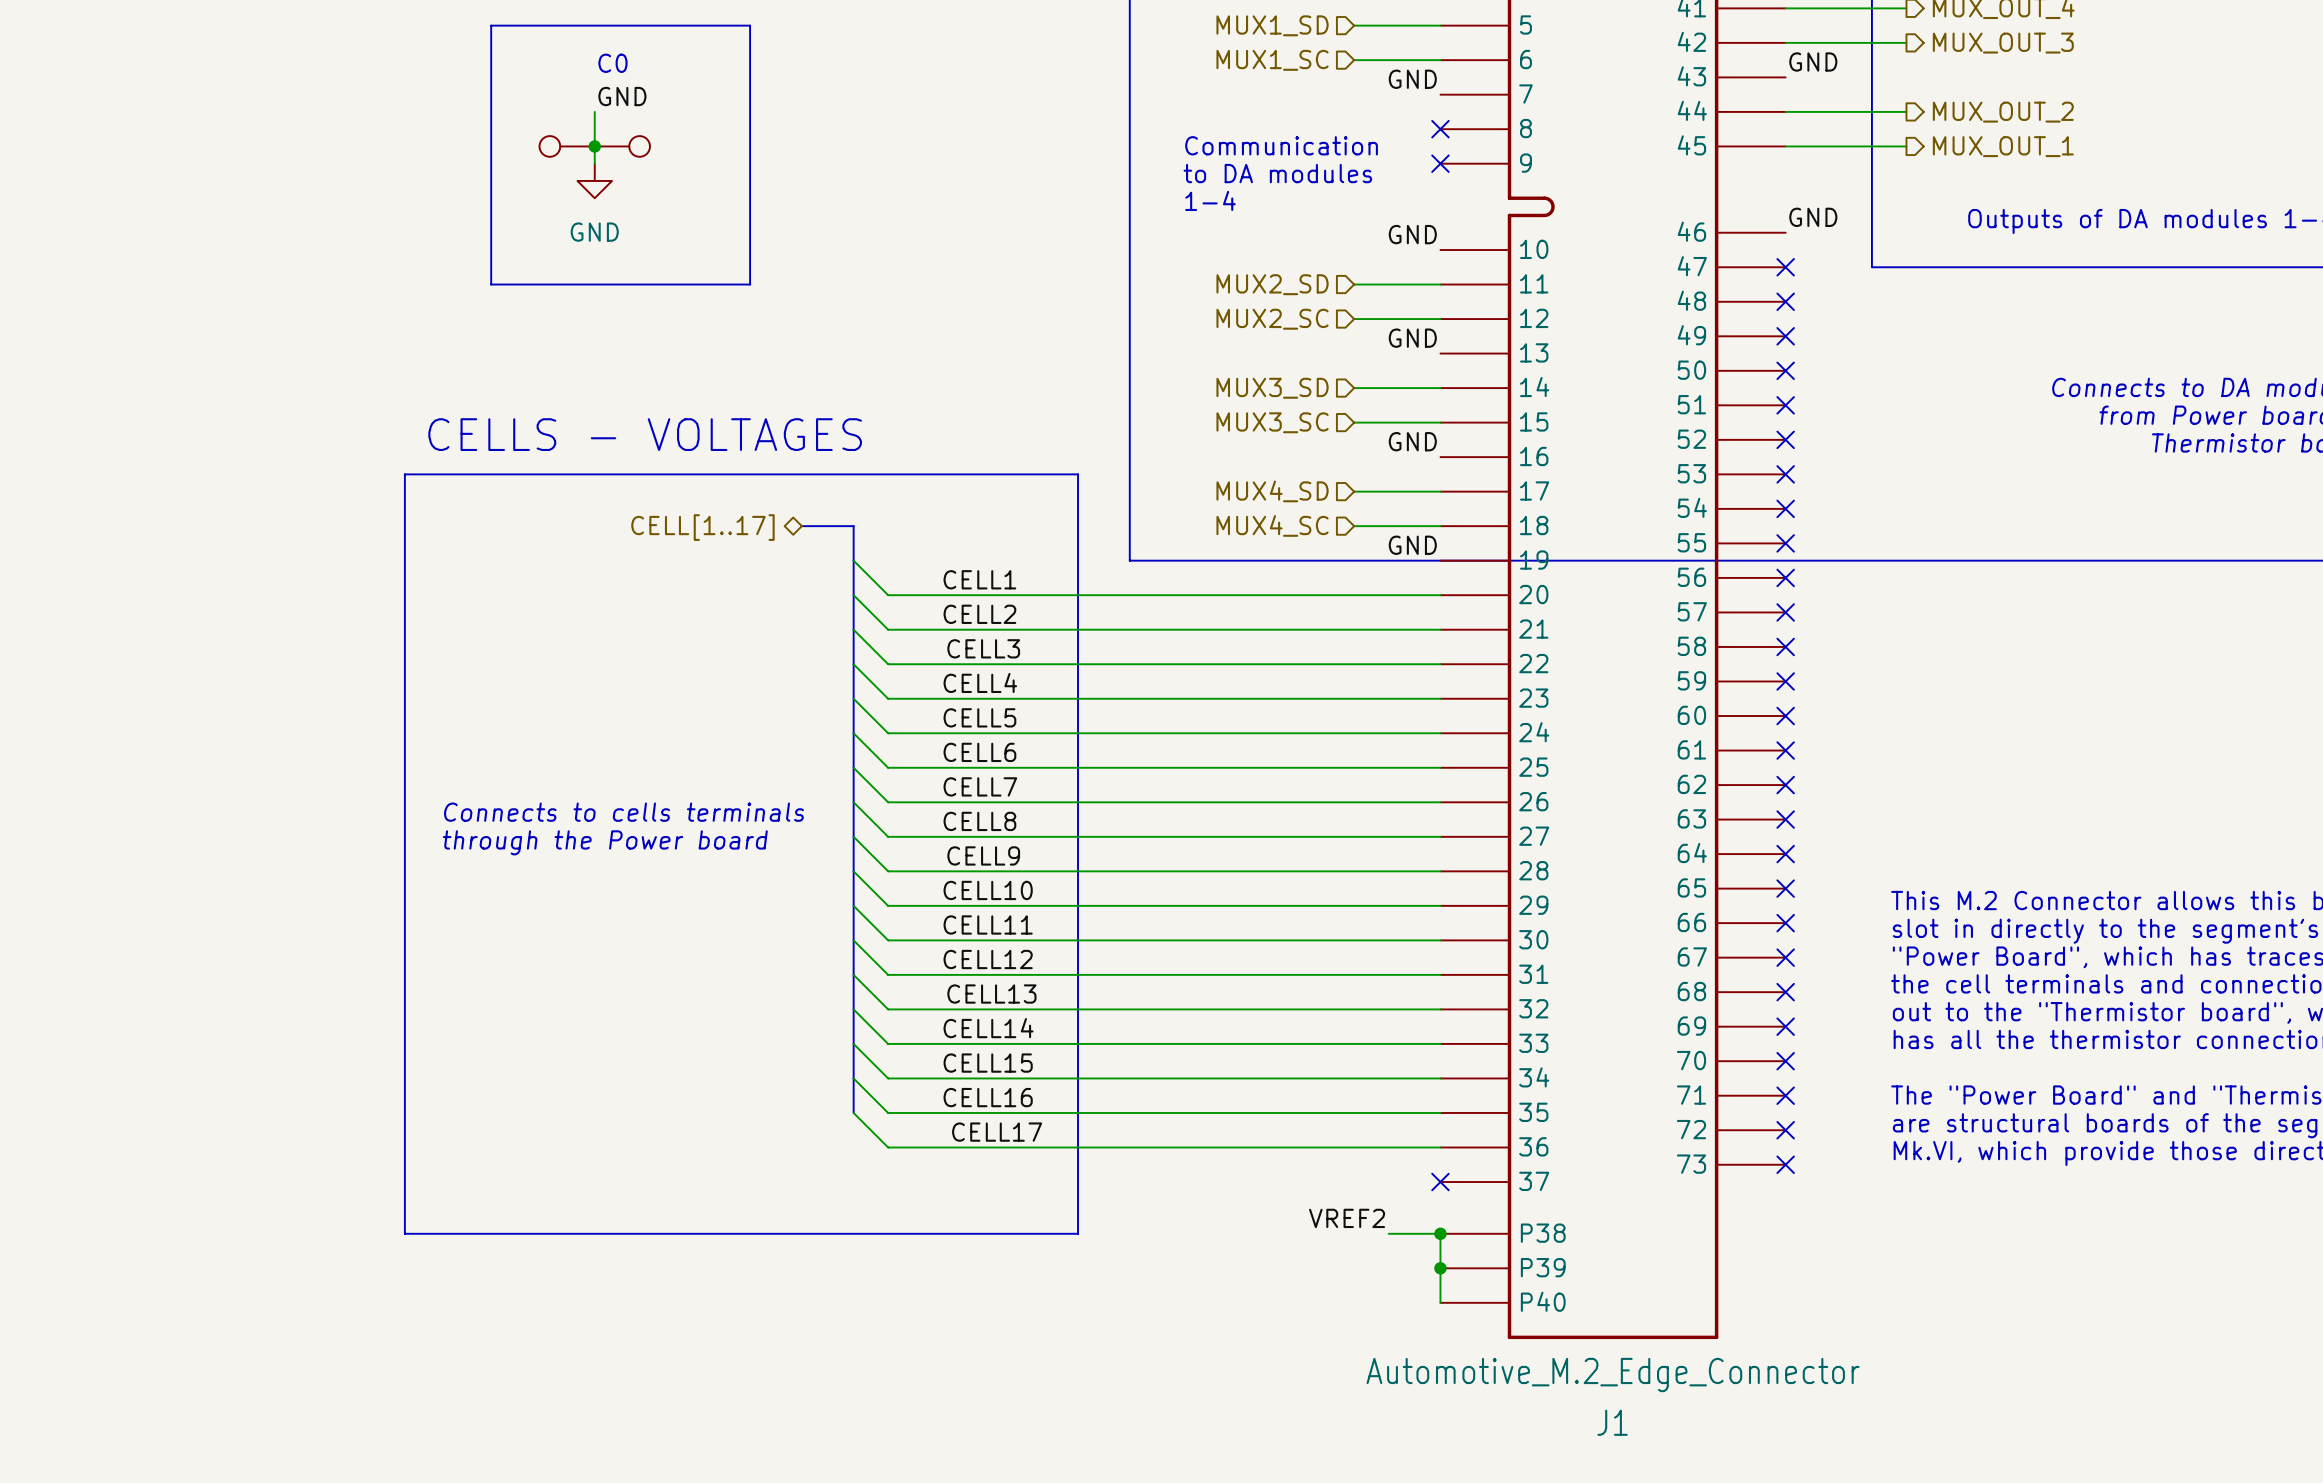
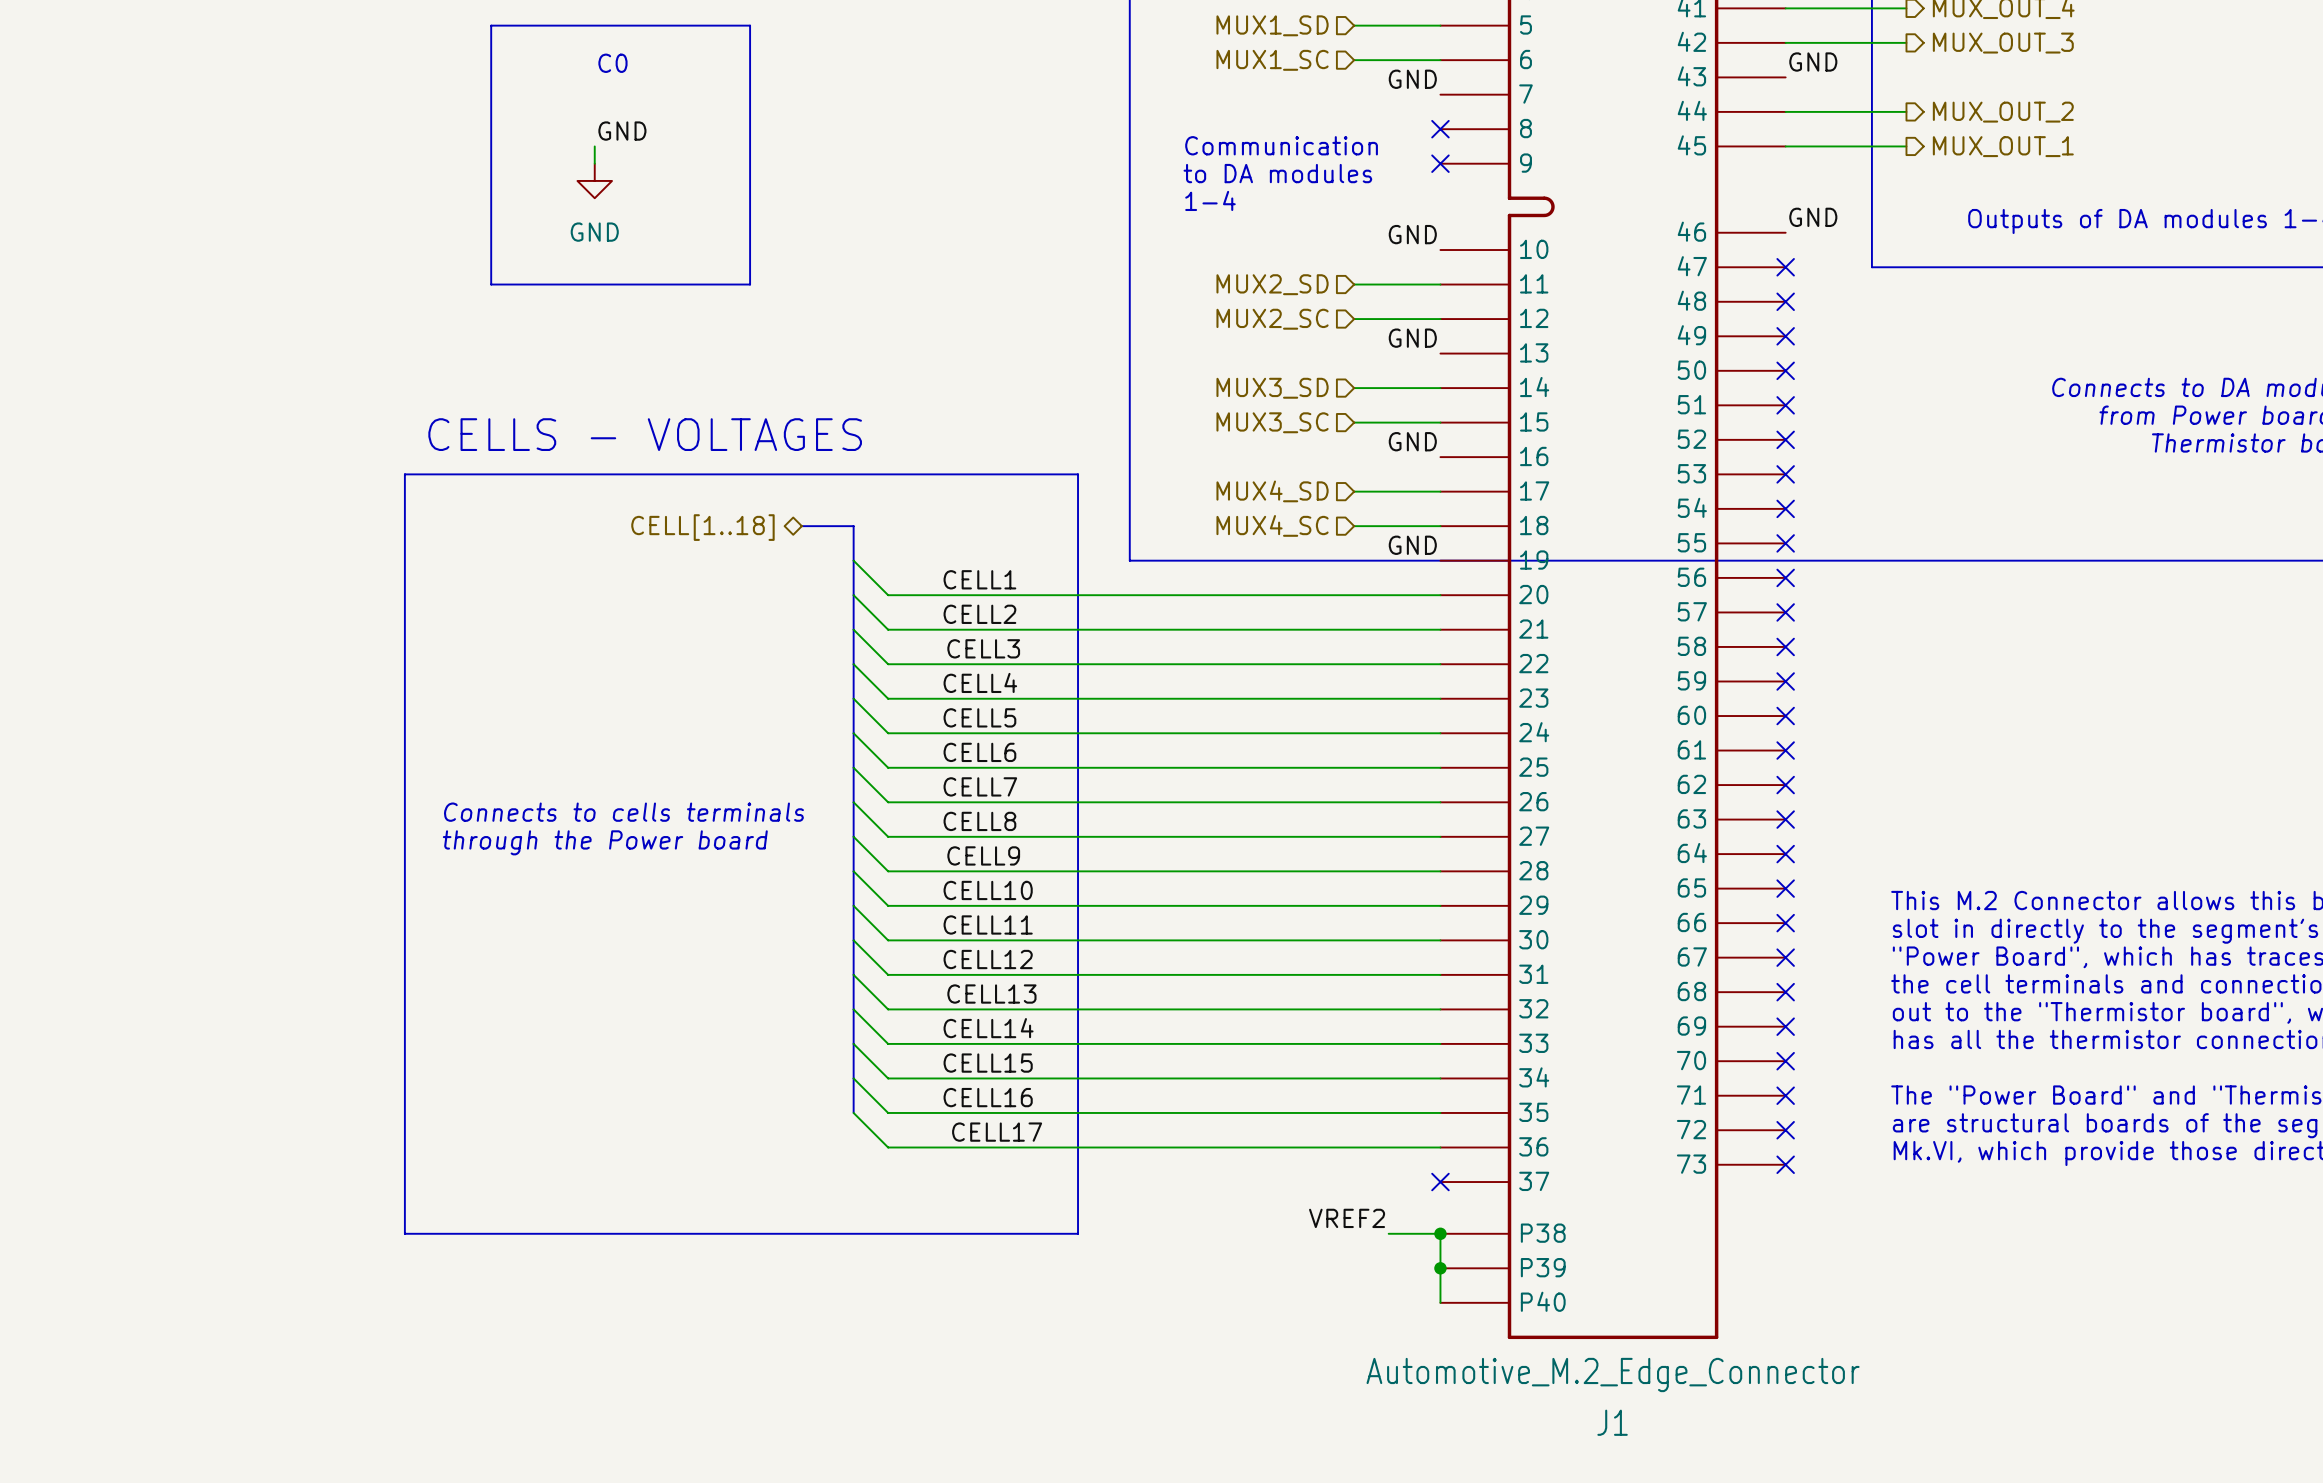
label position: GND (622, 96) -> GND (622, 131)
wire: (594, 111) (594, 146) -> none
part: (567, 146) -> none
junction: (594, 146) -> none
part: (622, 146) -> none
hierarchical label: CELL[1..17] (702, 527) -> CELL[1..18] (702, 527)

